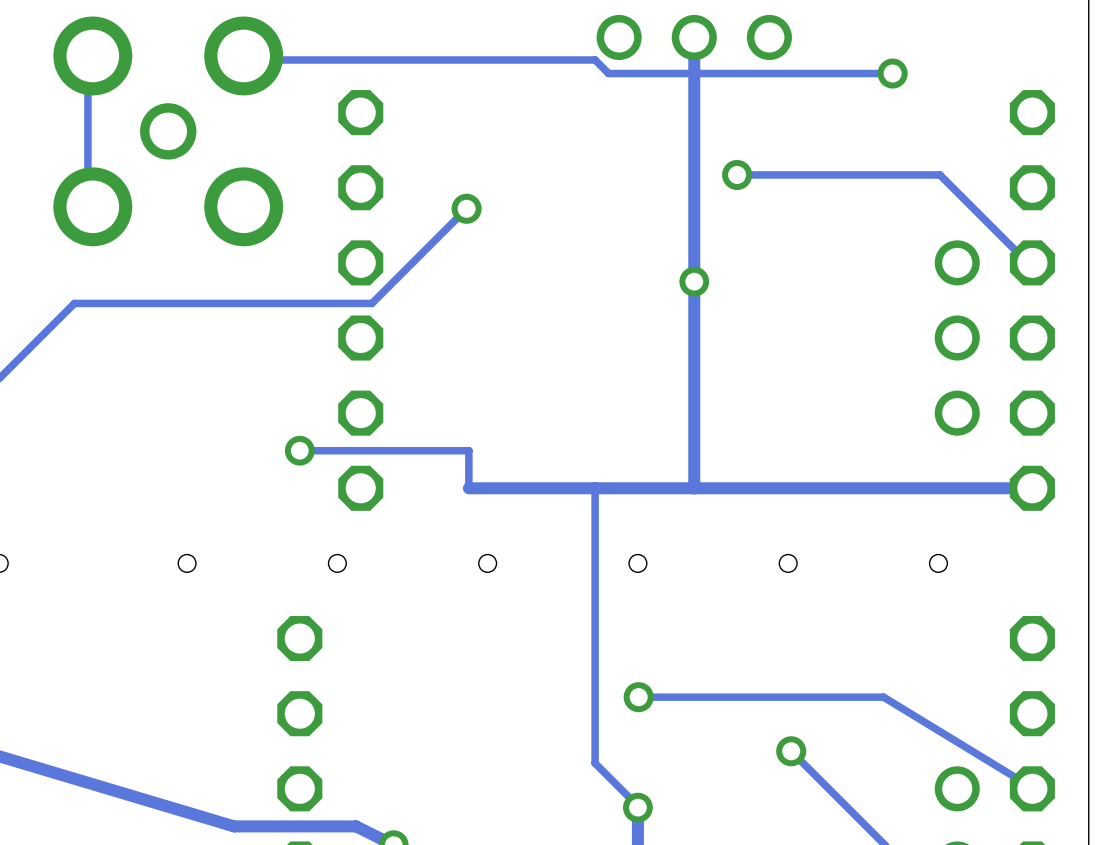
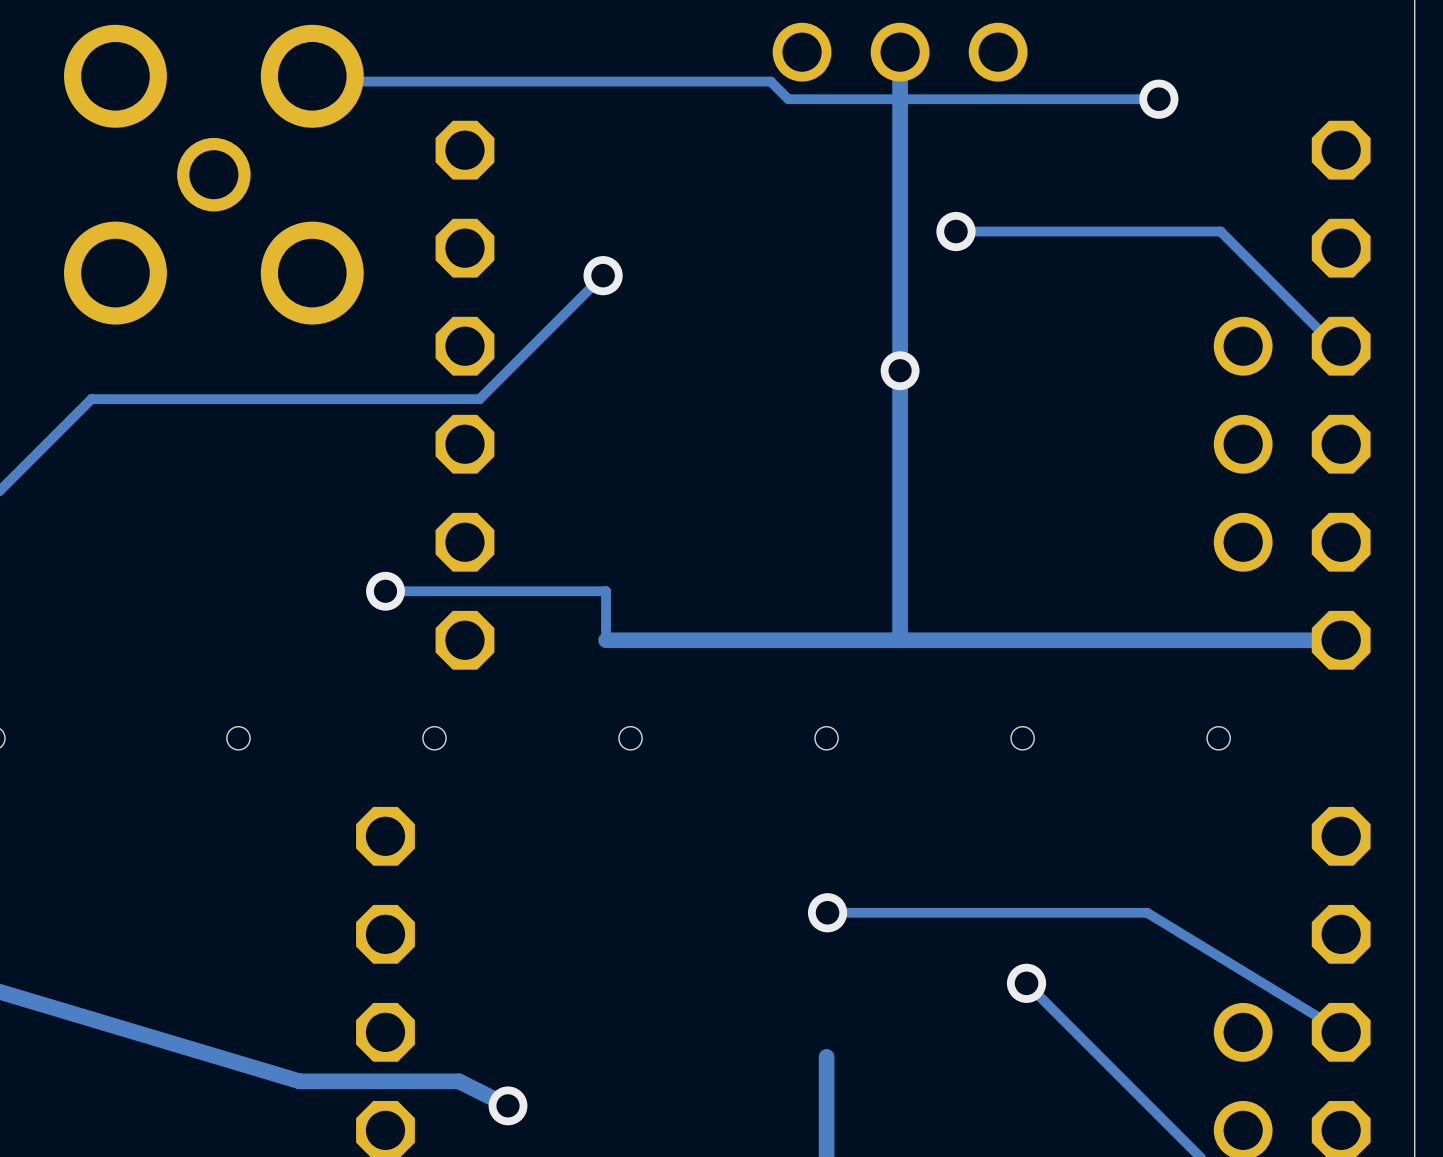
track: (87, 60) (87, 202) -> none
track: (595, 488) (595, 763) (637, 807) -> none
via: (637, 807) -> none

